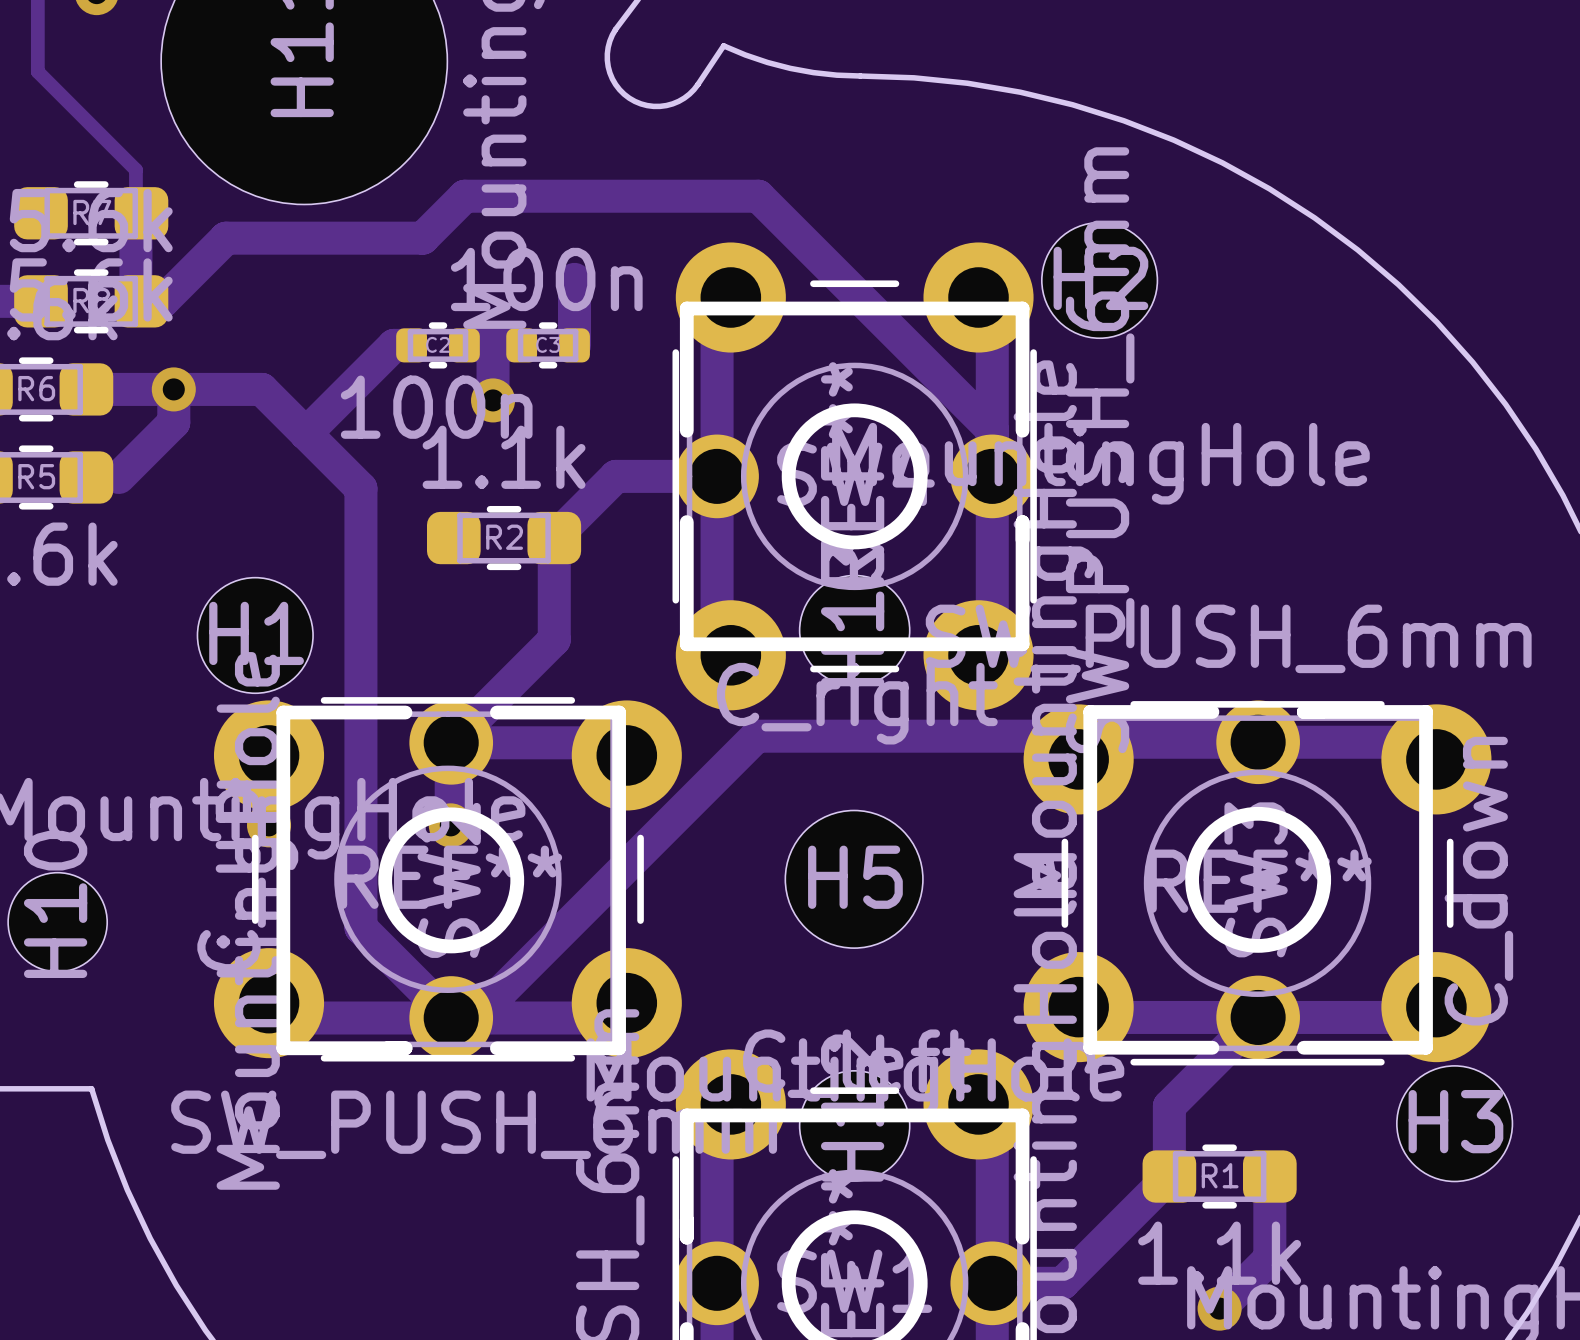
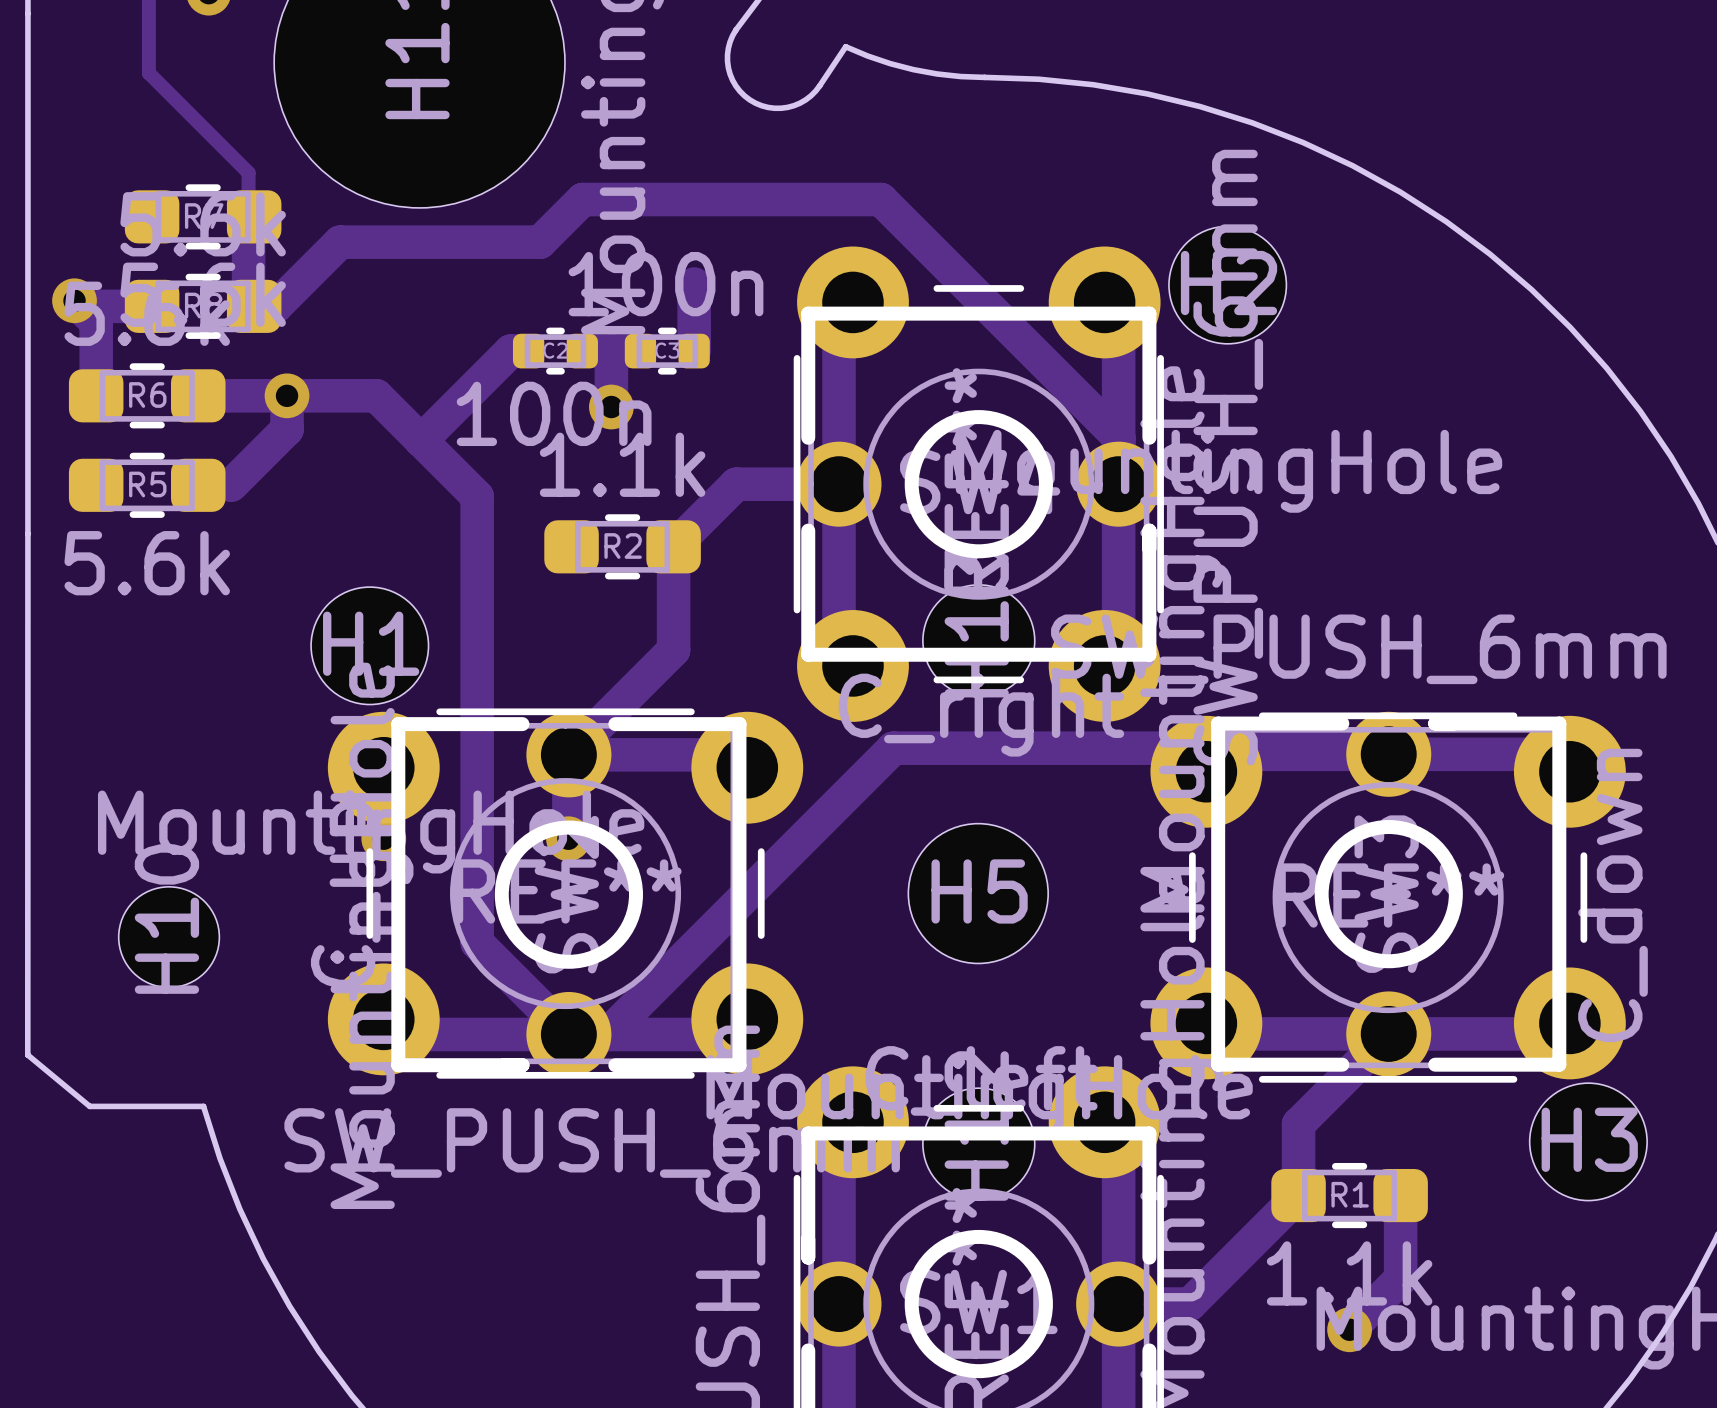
track: (770, 736) (756, 736) (474, 1018) -> (893, 748) (607, 1034)

